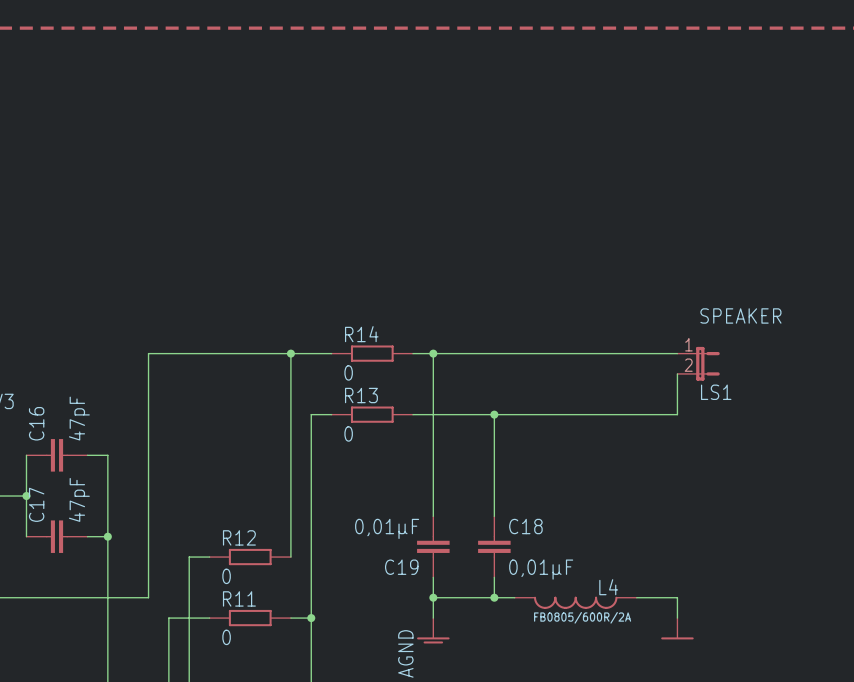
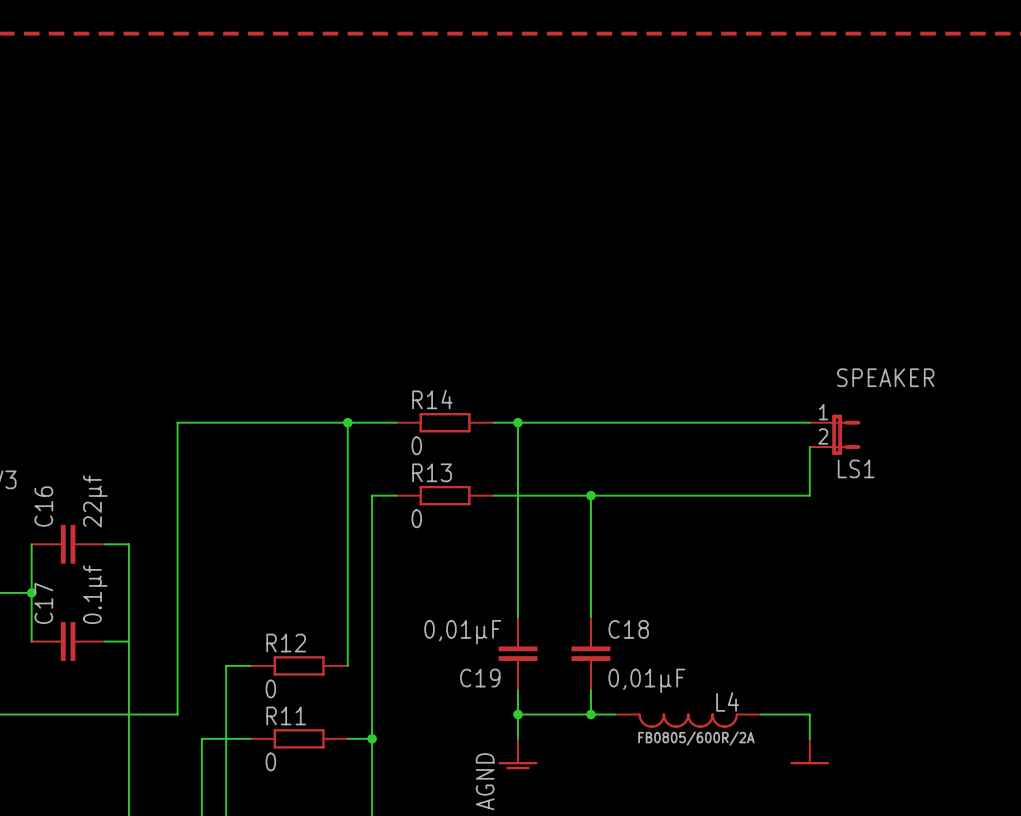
C16 value: 47pF (79, 418) -> 22µf (95, 501)
C17 value: 47pF (79, 499) -> 0.1µf (95, 594)
junction: (107, 536) -> none

